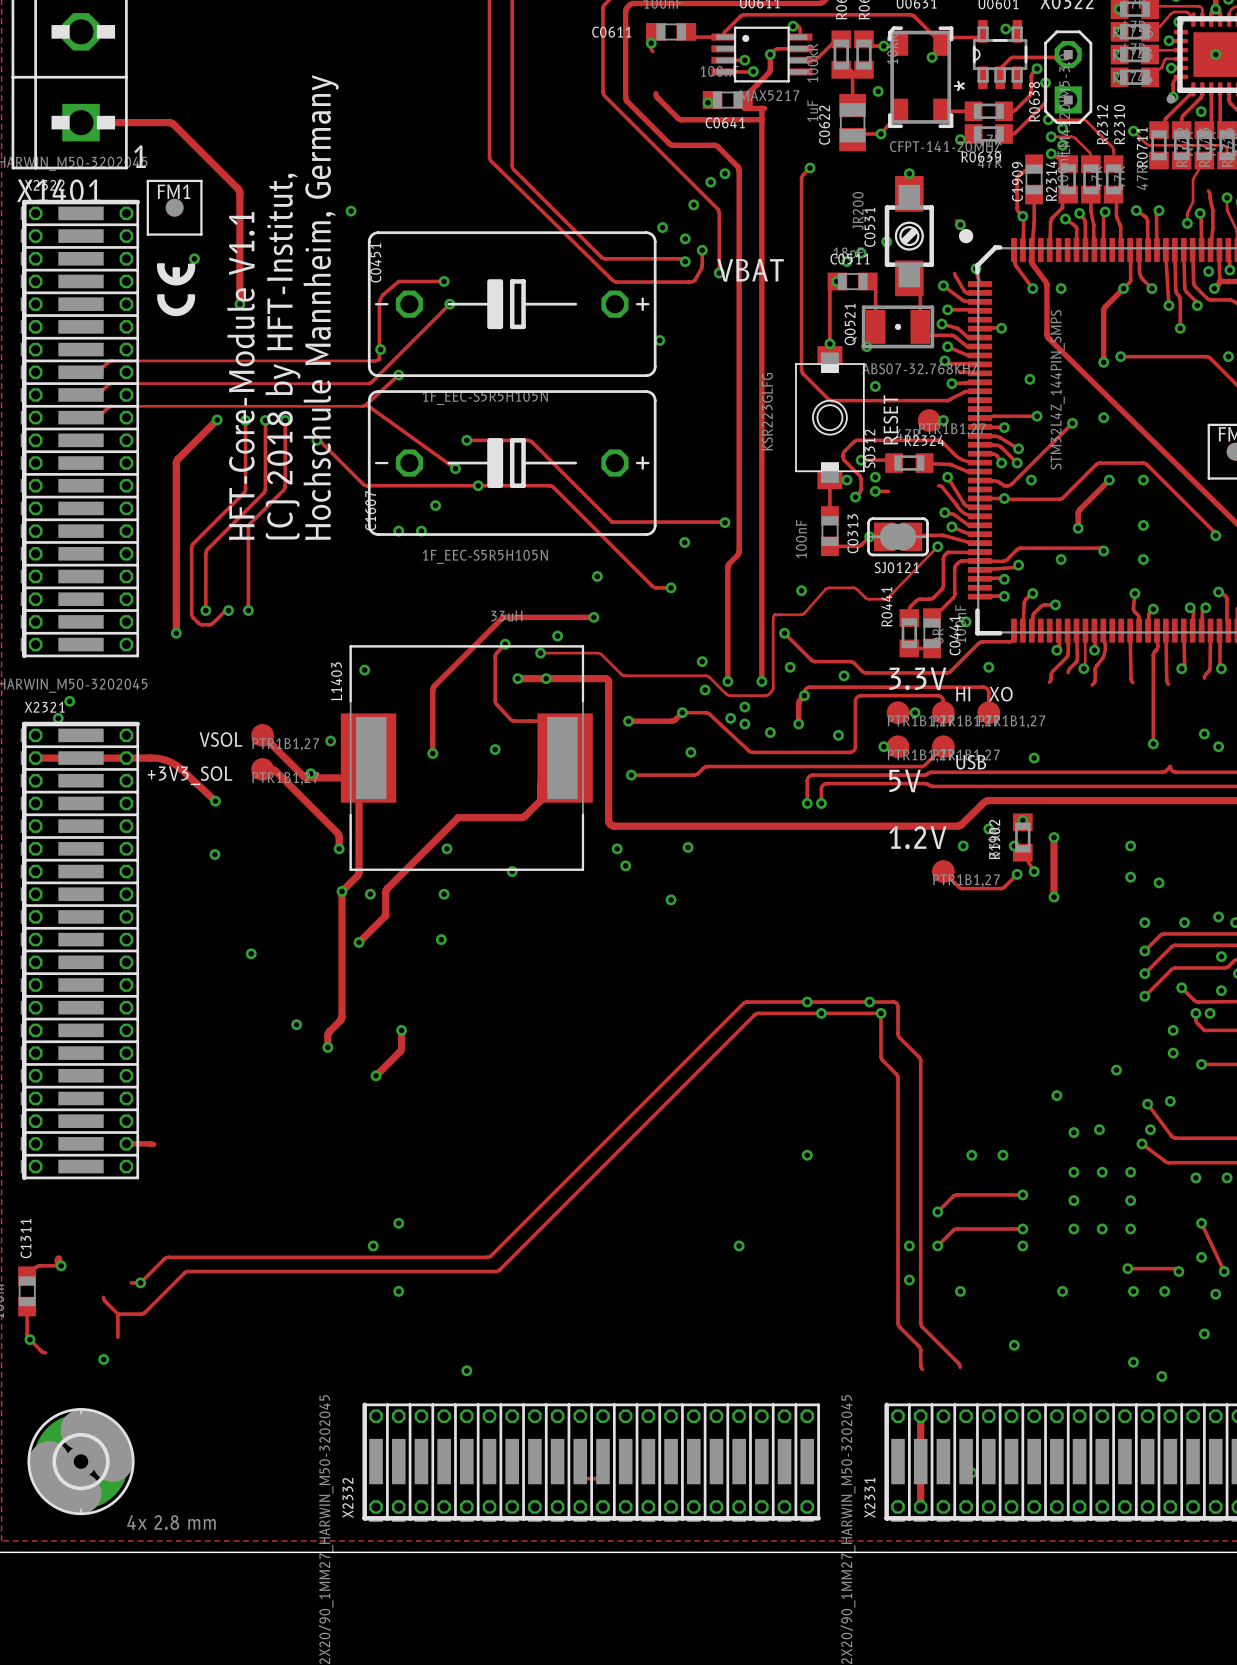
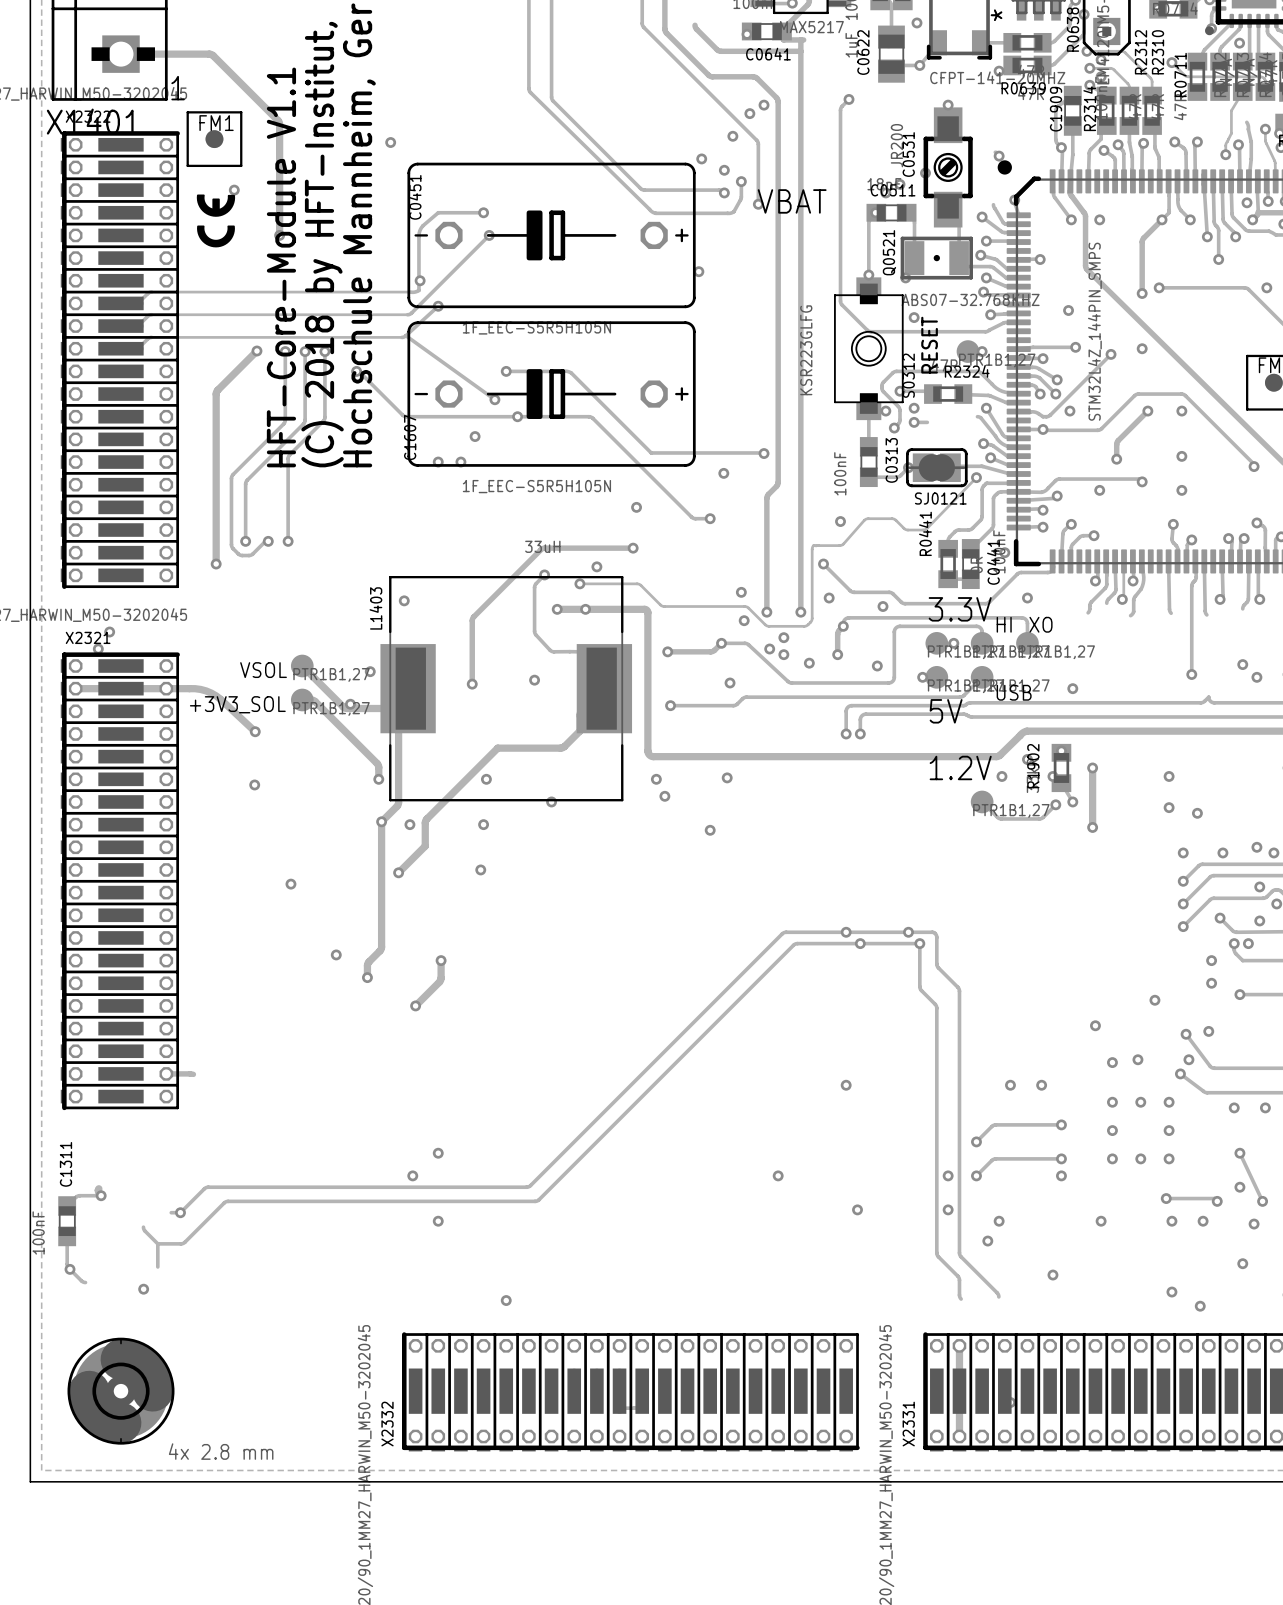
via: none -> (857, 1209)
via: none -> (987, 1241)

